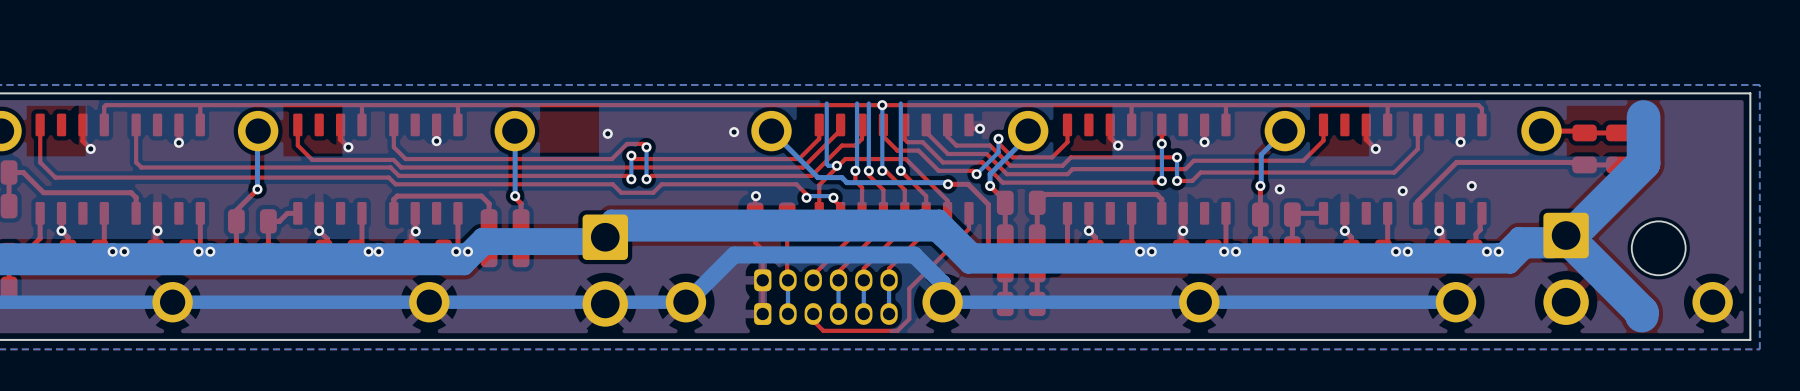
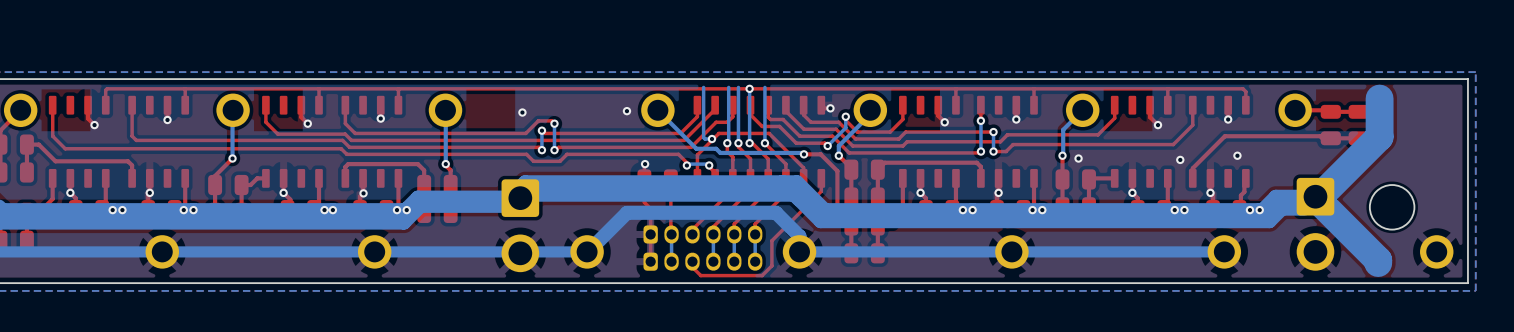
part: none -> (702, 234)
part: (825, 297) -> none

